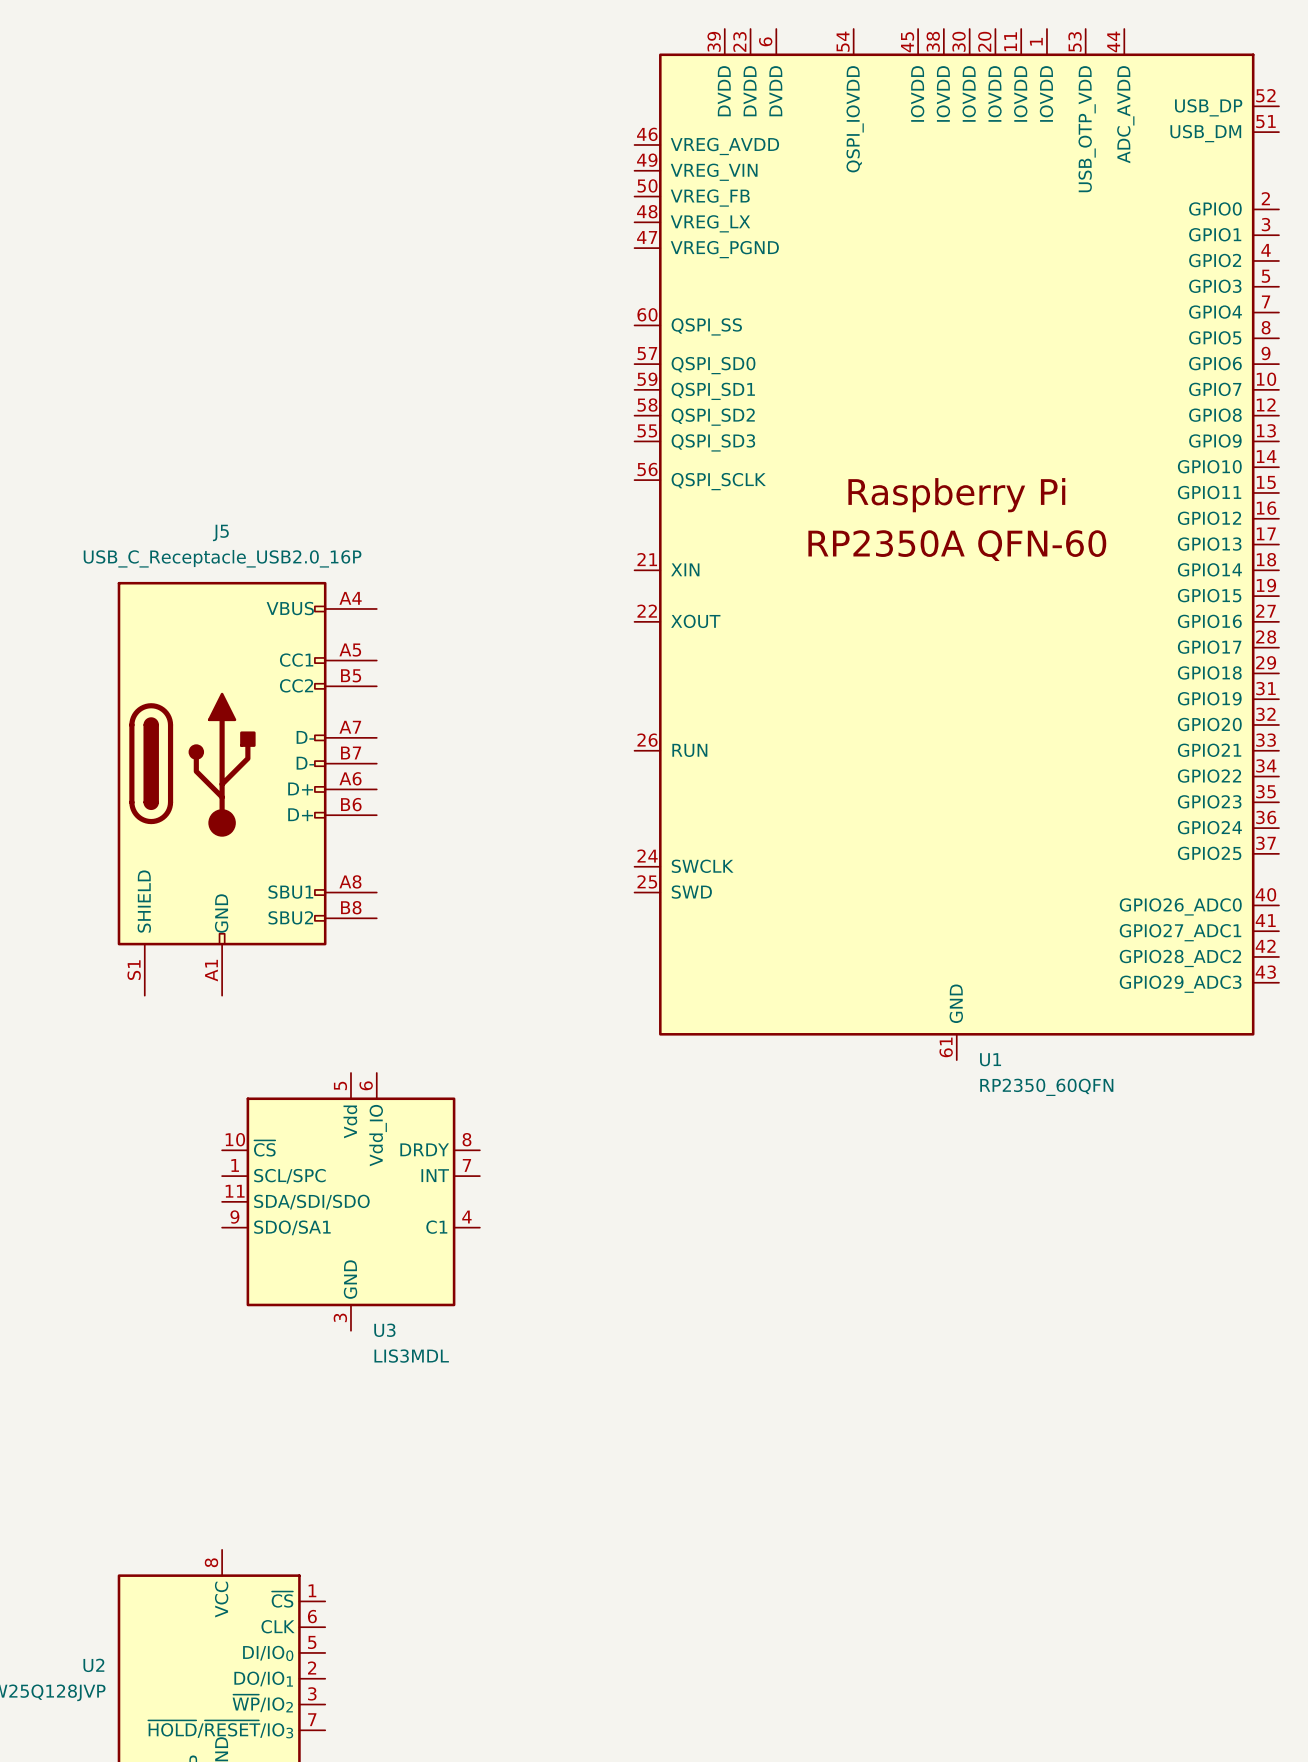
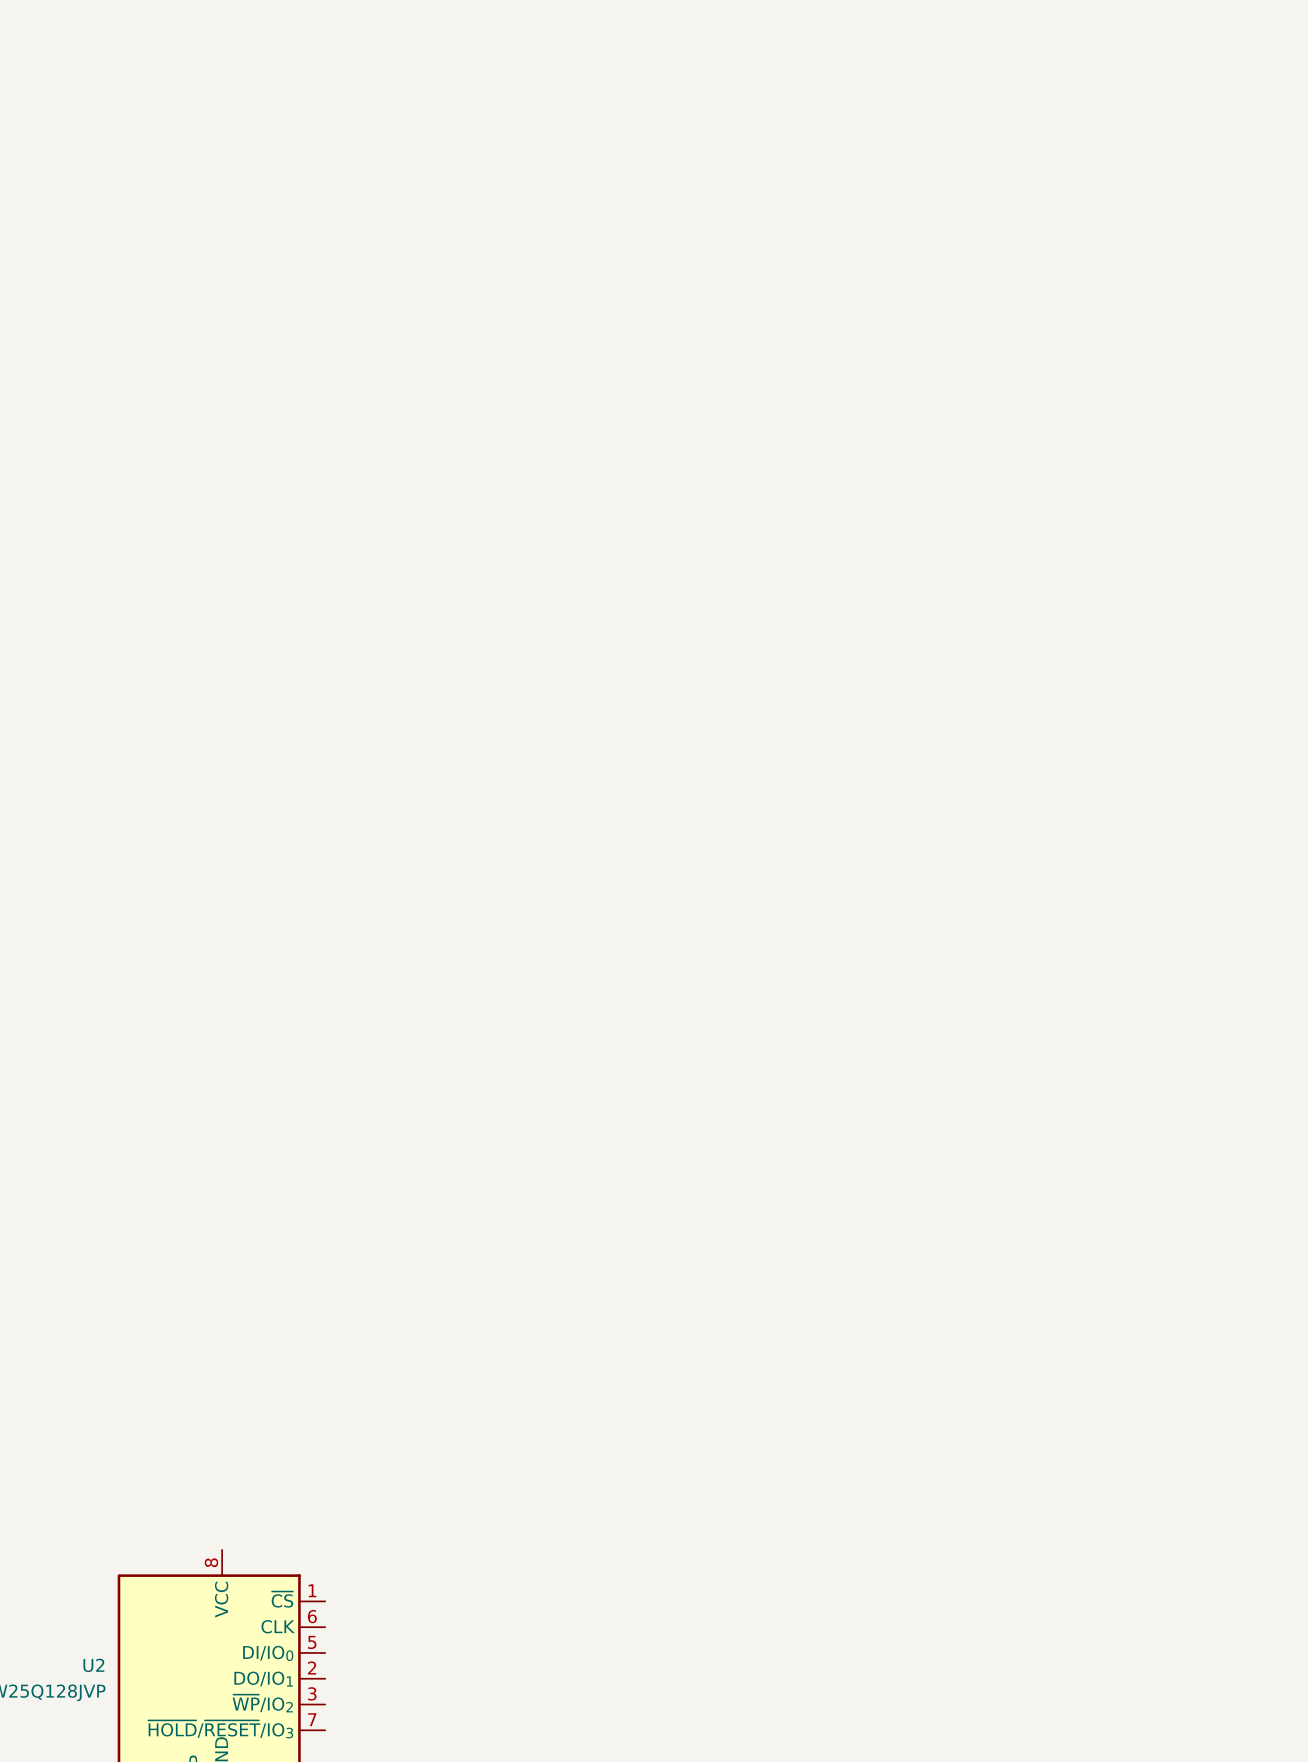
U1: RP2350_60QFN (956, 544) -> none
J5: USB_C_Receptacle_USB2.0_16P (247, 788) -> none
U3: LIS3MDL (350, 1201) -> none

